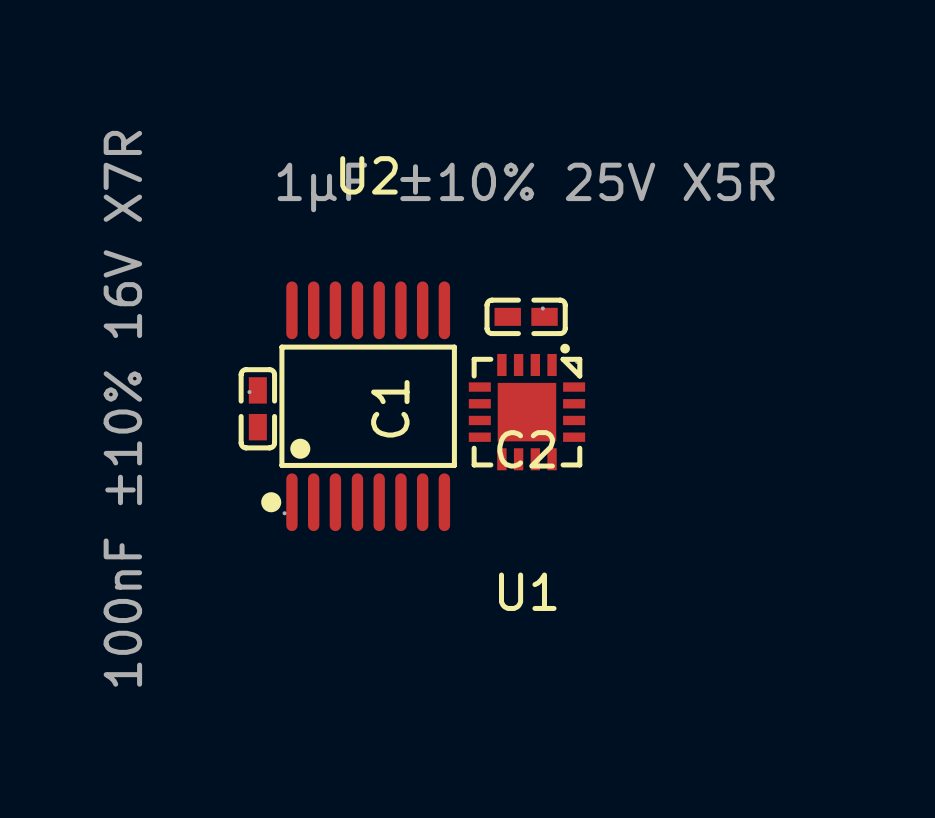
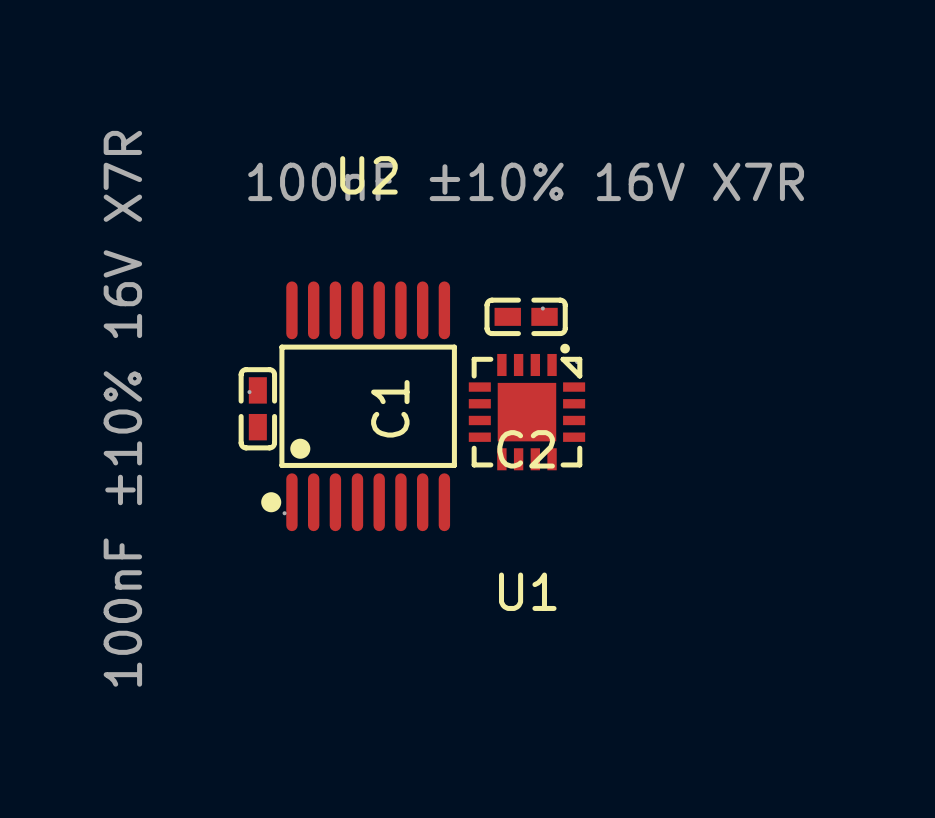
C2 value: 1µF ±10% 25V X5R (526, 187) -> 100nF ±10% 16V X7R (526, 181)

